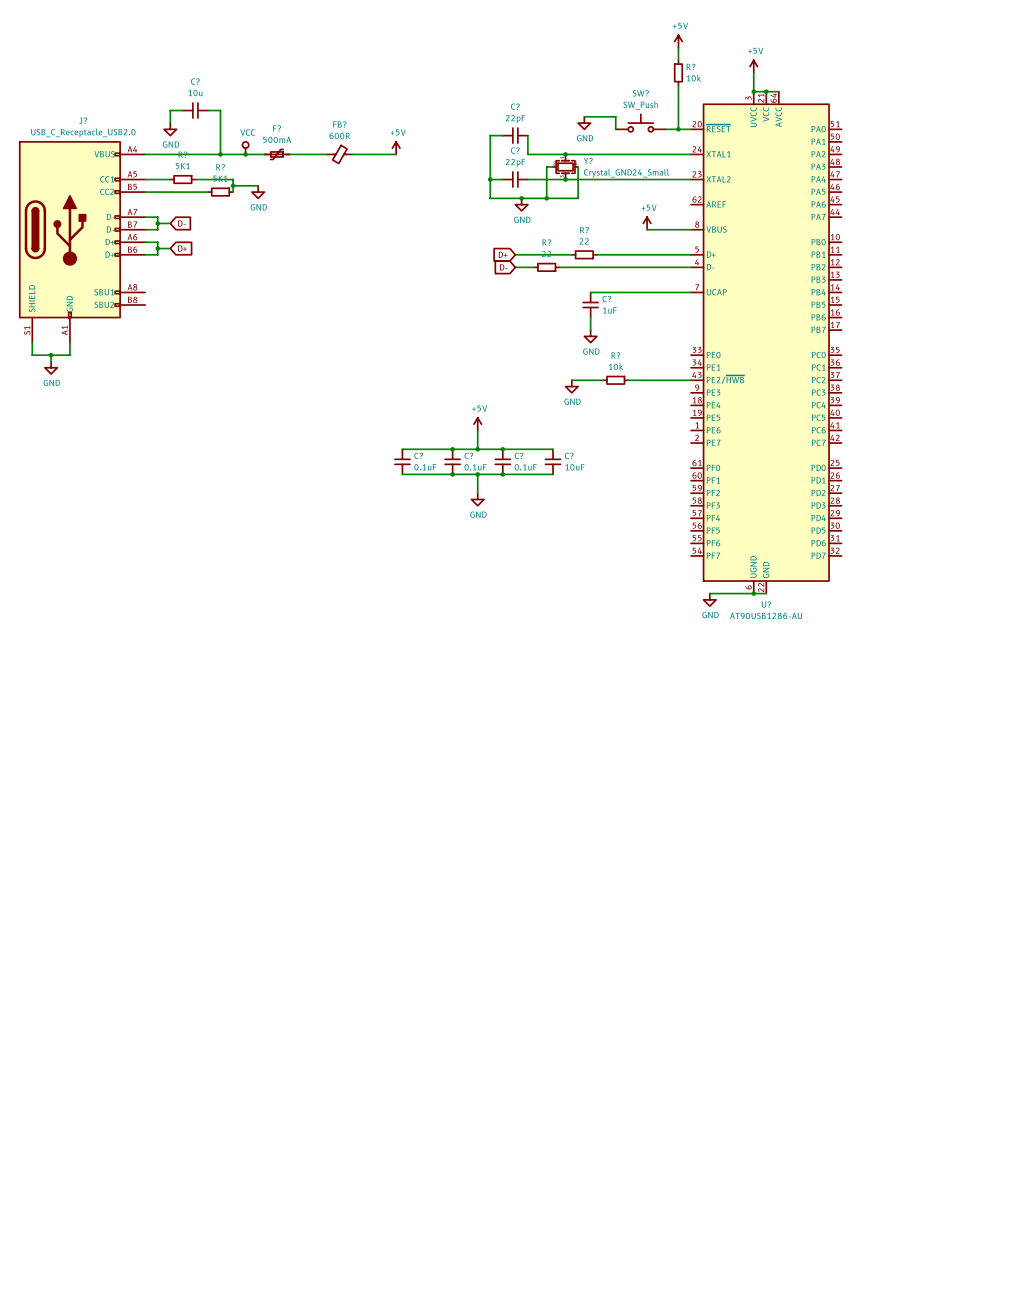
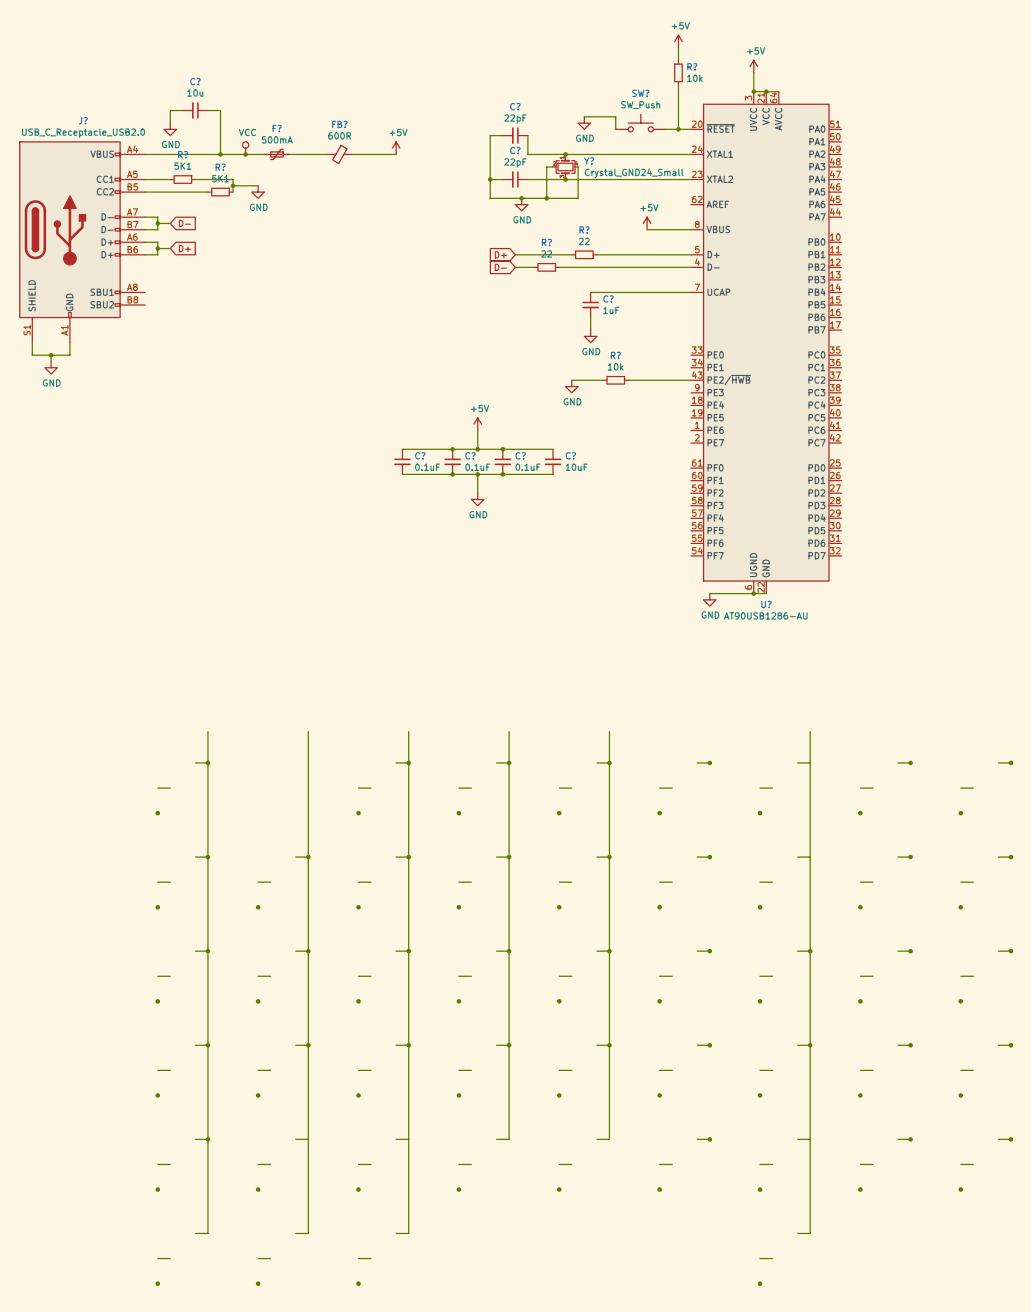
wire: none -> (207, 731) (207, 1233) (195, 1233)
wire: none -> (308, 731) (308, 1233) (295, 1233)
wire: none -> (408, 731) (408, 1233) (396, 1233)
wire: none -> (509, 731) (509, 1139) (496, 1139)
wire: none -> (609, 731) (609, 1139) (596, 1139)
wire: none -> (810, 731) (810, 1233) (797, 1233)
wire: none -> (195, 762) (207, 762)
junction: none -> (207, 762)
wire: none -> (396, 762) (408, 762)
junction: none -> (408, 762)
wire: none -> (496, 762) (509, 762)
junction: none -> (509, 762)
wire: none -> (596, 762) (609, 762)
junction: none -> (609, 762)
wire: none -> (697, 762) (709, 762)
junction: none -> (709, 762)
wire: none -> (797, 762) (810, 762)
wire: none -> (898, 762) (910, 762)
junction: none -> (910, 762)
wire: none -> (998, 762) (1010, 762)
junction: none -> (1010, 762)
wire: none -> (157, 788) (170, 788)
wire: none -> (358, 788) (371, 788)
wire: none -> (458, 788) (471, 788)
wire: none -> (559, 788) (571, 788)
wire: none -> (659, 788) (672, 788)
wire: none -> (760, 788) (772, 788)
wire: none -> (860, 788) (872, 788)
wire: none -> (960, 788) (973, 788)
junction: none -> (157, 813)
junction: none -> (358, 813)
junction: none -> (458, 813)
junction: none -> (559, 813)
junction: none -> (659, 813)
junction: none -> (760, 813)
junction: none -> (860, 813)
junction: none -> (960, 813)
wire: none -> (195, 857) (207, 857)
junction: none -> (207, 857)
wire: none -> (295, 857) (308, 857)
junction: none -> (308, 857)
wire: none -> (396, 857) (408, 857)
junction: none -> (408, 857)
wire: none -> (496, 857) (509, 857)
junction: none -> (509, 857)
wire: none -> (596, 857) (609, 857)
junction: none -> (609, 857)
wire: none -> (697, 857) (709, 857)
junction: none -> (709, 857)
wire: none -> (797, 857) (810, 857)
wire: none -> (898, 857) (910, 857)
junction: none -> (910, 857)
wire: none -> (998, 857) (1010, 857)
junction: none -> (1010, 857)
wire: none -> (157, 882) (170, 882)
wire: none -> (258, 882) (270, 882)
wire: none -> (358, 882) (371, 882)
wire: none -> (458, 882) (471, 882)
wire: none -> (559, 882) (571, 882)
wire: none -> (659, 882) (672, 882)
wire: none -> (760, 882) (772, 882)
wire: none -> (860, 882) (872, 882)
wire: none -> (960, 882) (973, 882)
junction: none -> (157, 907)
junction: none -> (258, 907)
junction: none -> (358, 907)
junction: none -> (458, 907)
junction: none -> (559, 907)
junction: none -> (659, 907)
junction: none -> (760, 907)
junction: none -> (860, 907)
junction: none -> (960, 907)
wire: none -> (195, 951) (207, 951)
junction: none -> (207, 951)
wire: none -> (295, 951) (308, 951)
junction: none -> (308, 951)
wire: none -> (396, 951) (408, 951)
junction: none -> (408, 951)
wire: none -> (496, 951) (509, 951)
junction: none -> (509, 951)
wire: none -> (596, 951) (609, 951)
junction: none -> (609, 951)
wire: none -> (697, 951) (709, 951)
junction: none -> (709, 951)
wire: none -> (797, 951) (810, 951)
junction: none -> (810, 951)
wire: none -> (898, 951) (910, 951)
junction: none -> (910, 951)
wire: none -> (998, 951) (1010, 951)
junction: none -> (1010, 951)
wire: none -> (157, 976) (170, 976)
wire: none -> (258, 976) (270, 976)
wire: none -> (358, 976) (371, 976)
wire: none -> (458, 976) (471, 976)
wire: none -> (559, 976) (571, 976)
wire: none -> (659, 976) (672, 976)
wire: none -> (760, 976) (772, 976)
wire: none -> (860, 976) (872, 976)
wire: none -> (960, 976) (973, 976)
junction: none -> (157, 1001)
junction: none -> (258, 1001)
junction: none -> (358, 1001)
junction: none -> (458, 1001)
junction: none -> (559, 1001)
junction: none -> (659, 1001)
junction: none -> (760, 1001)
junction: none -> (860, 1001)
junction: none -> (960, 1001)
wire: none -> (195, 1045) (207, 1045)
junction: none -> (207, 1045)
wire: none -> (295, 1045) (308, 1045)
junction: none -> (308, 1045)
wire: none -> (396, 1045) (408, 1045)
junction: none -> (408, 1045)
wire: none -> (496, 1045) (509, 1045)
junction: none -> (509, 1045)
wire: none -> (596, 1045) (609, 1045)
junction: none -> (609, 1045)
wire: none -> (697, 1045) (709, 1045)
junction: none -> (709, 1045)
wire: none -> (797, 1045) (810, 1045)
junction: none -> (810, 1045)
wire: none -> (898, 1045) (910, 1045)
junction: none -> (910, 1045)
wire: none -> (998, 1045) (1010, 1045)
junction: none -> (1010, 1045)
wire: none -> (157, 1070) (170, 1070)
wire: none -> (258, 1070) (270, 1070)
wire: none -> (358, 1070) (371, 1070)
wire: none -> (458, 1070) (471, 1070)
wire: none -> (559, 1070) (571, 1070)
wire: none -> (659, 1070) (672, 1070)
wire: none -> (760, 1070) (772, 1070)
wire: none -> (860, 1070) (872, 1070)
wire: none -> (960, 1070) (973, 1070)
junction: none -> (157, 1095)
junction: none -> (258, 1095)
junction: none -> (358, 1095)
junction: none -> (458, 1095)
junction: none -> (559, 1095)
junction: none -> (659, 1095)
junction: none -> (760, 1095)
junction: none -> (860, 1095)
junction: none -> (960, 1095)
wire: none -> (195, 1139) (207, 1139)
junction: none -> (207, 1139)
wire: none -> (295, 1139) (308, 1139)
wire: none -> (396, 1139) (408, 1139)
wire: none -> (697, 1139) (709, 1139)
junction: none -> (709, 1139)
wire: none -> (797, 1139) (810, 1139)
wire: none -> (898, 1139) (910, 1139)
junction: none -> (910, 1139)
wire: none -> (998, 1139) (1010, 1139)
junction: none -> (1010, 1139)
wire: none -> (157, 1164) (170, 1164)
wire: none -> (258, 1164) (270, 1164)
wire: none -> (358, 1164) (371, 1164)
wire: none -> (458, 1164) (471, 1164)
wire: none -> (559, 1164) (571, 1164)
wire: none -> (659, 1164) (672, 1164)
wire: none -> (760, 1164) (772, 1164)
wire: none -> (860, 1164) (872, 1164)
wire: none -> (960, 1164) (973, 1164)
junction: none -> (157, 1189)
junction: none -> (258, 1189)
junction: none -> (358, 1189)
junction: none -> (458, 1189)
junction: none -> (559, 1189)
junction: none -> (659, 1189)
junction: none -> (760, 1189)
junction: none -> (860, 1189)
junction: none -> (960, 1189)
wire: none -> (157, 1258) (170, 1258)
wire: none -> (258, 1258) (270, 1258)
wire: none -> (358, 1258) (371, 1258)
wire: none -> (760, 1258) (772, 1258)
junction: none -> (157, 1283)
junction: none -> (258, 1283)
junction: none -> (358, 1283)
junction: none -> (760, 1283)

